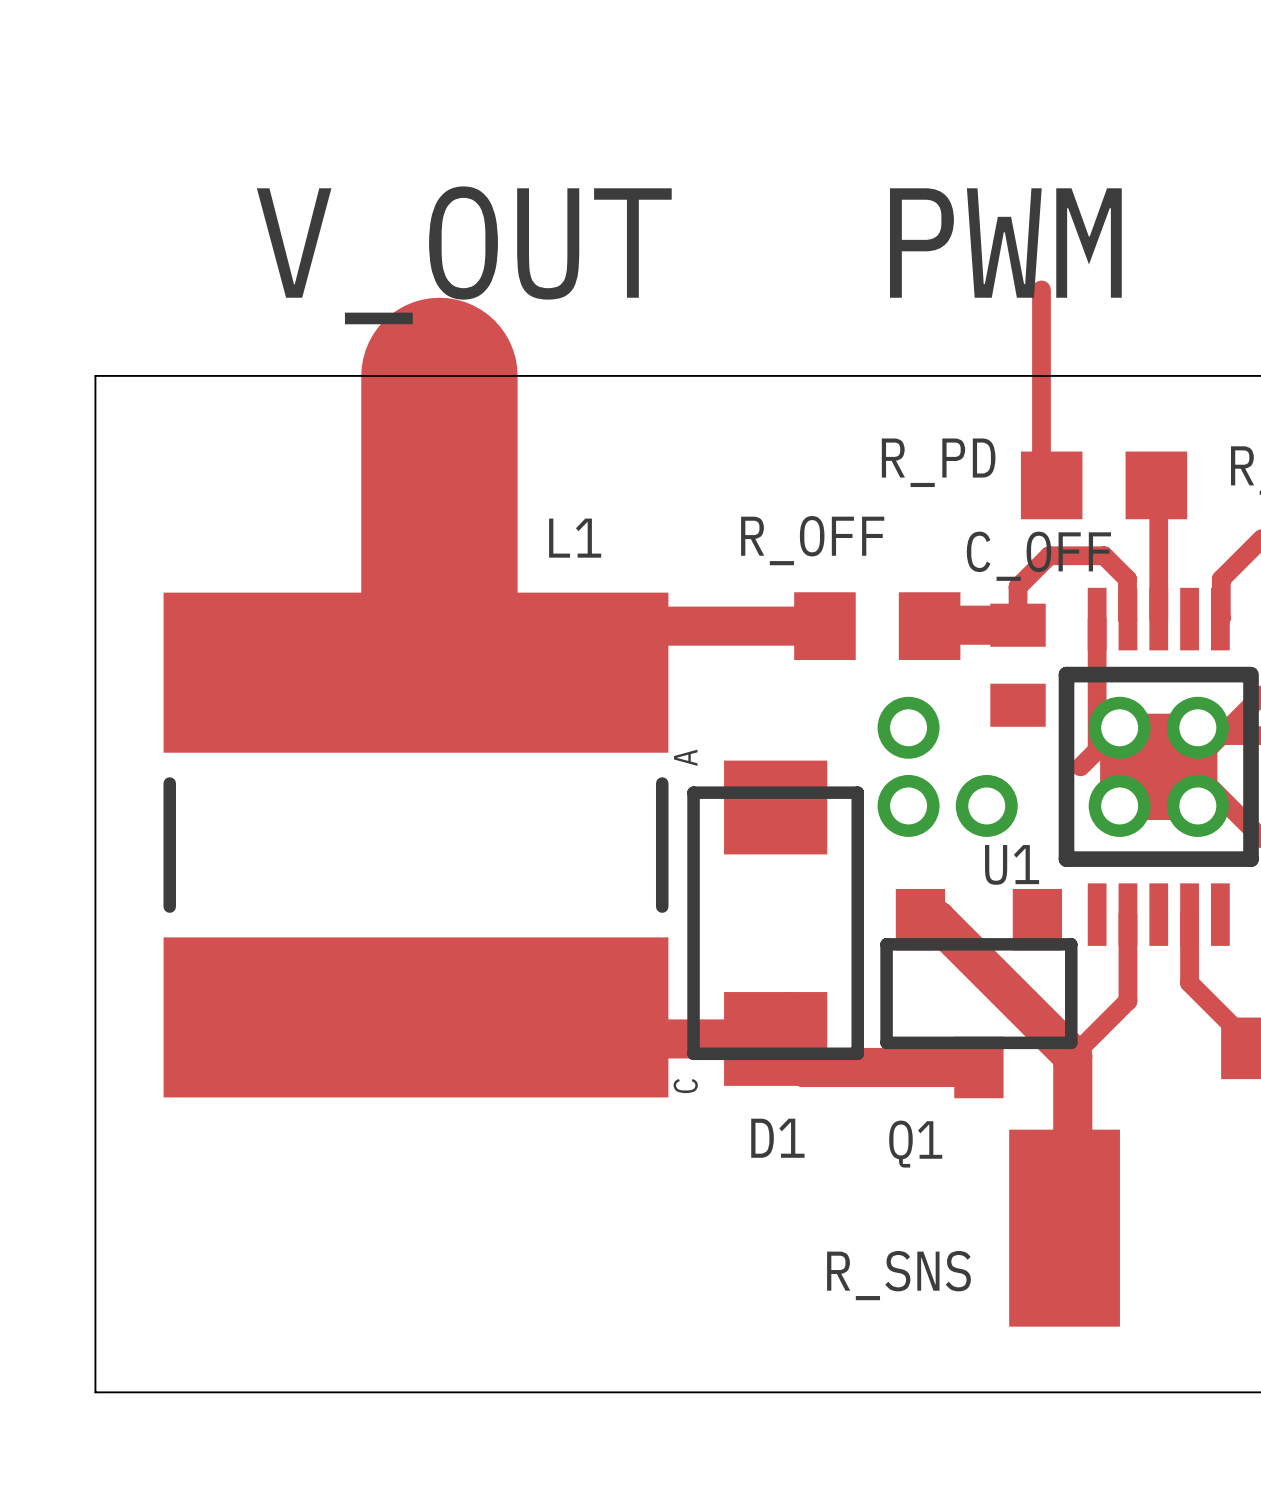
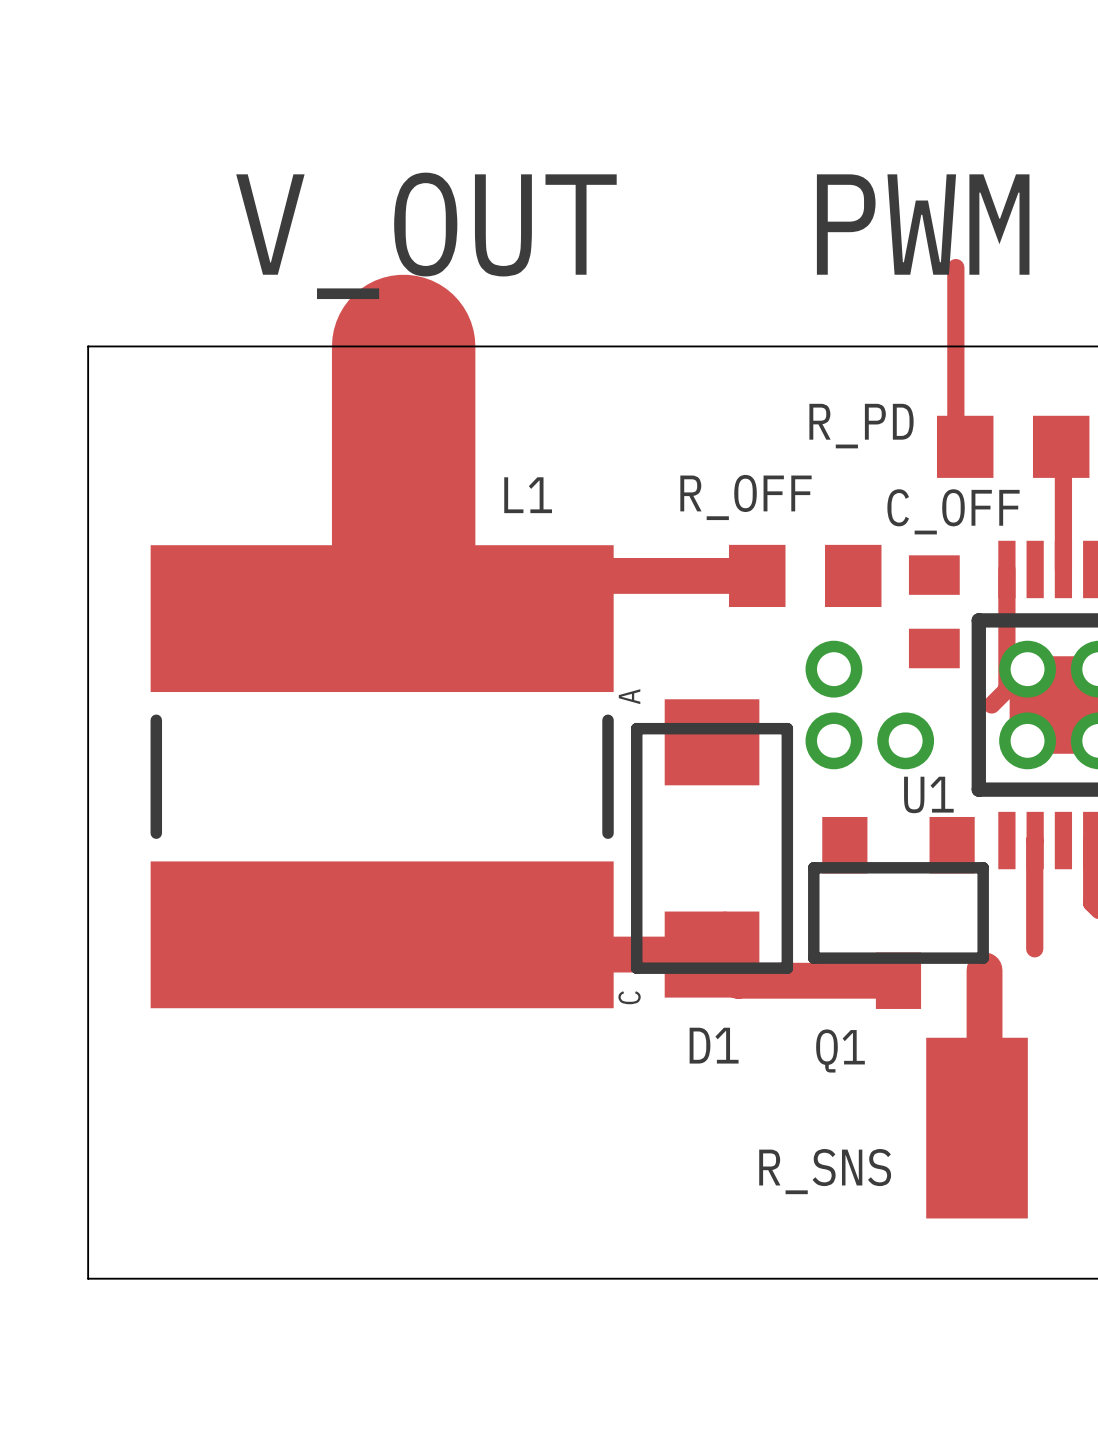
track: (1127, 618) (1127, 579) (1104, 555) (1049, 555) (1018, 587) (1018, 625) (929, 626) -> none
track: (1127, 914) (1127, 1000) (1072, 1056) (936, 919) (920, 919) -> (1034, 840) (1034, 948)

